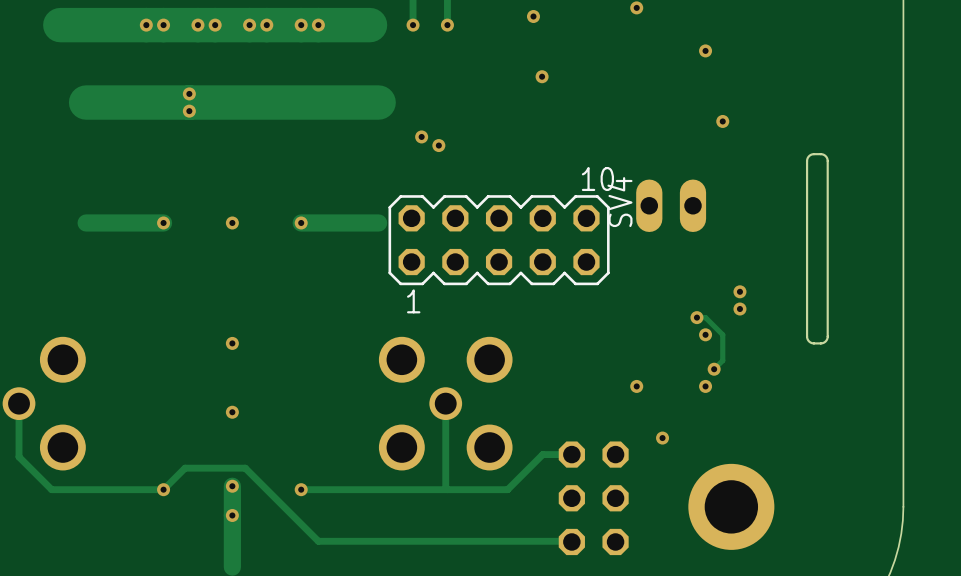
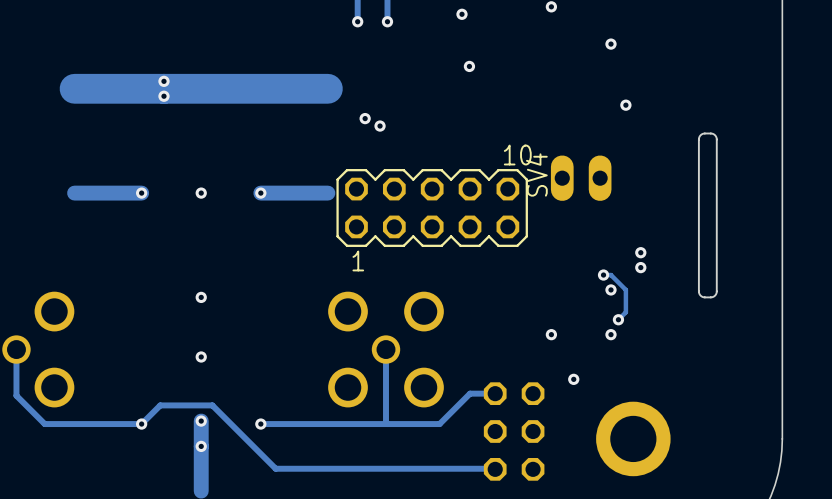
via: (146, 25) -> none
via: (163, 25) -> none
via: (197, 25) -> none
via: (215, 25) -> none
via: (249, 25) -> none
via: (266, 25) -> none
via: (301, 25) -> none
via: (318, 25) -> none
track: (370, 25) (60, 25) -> none

